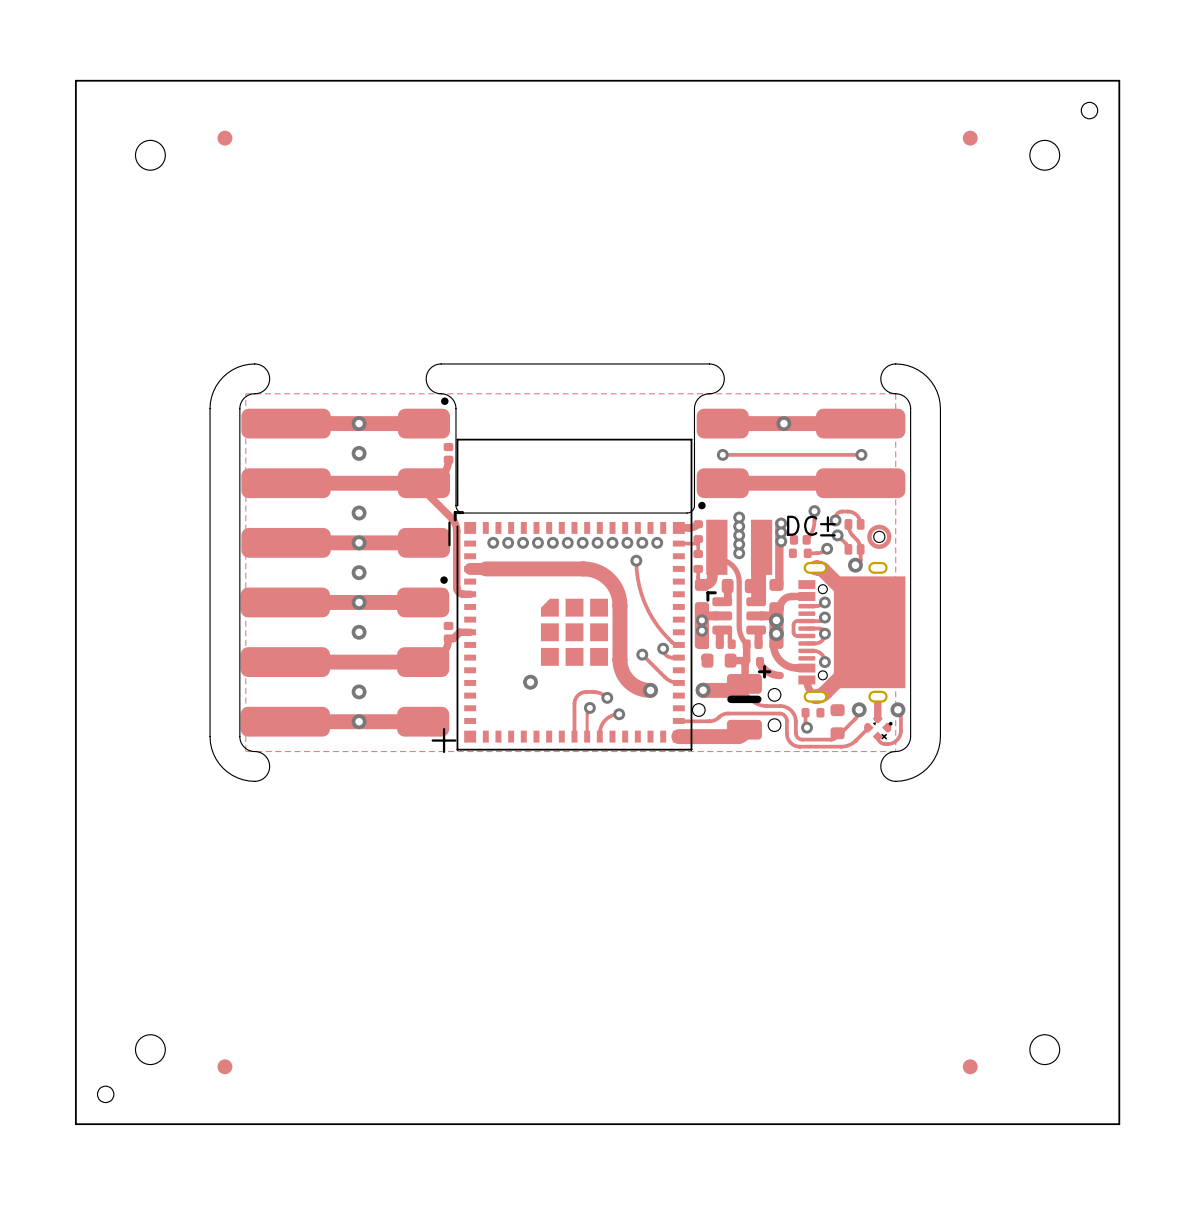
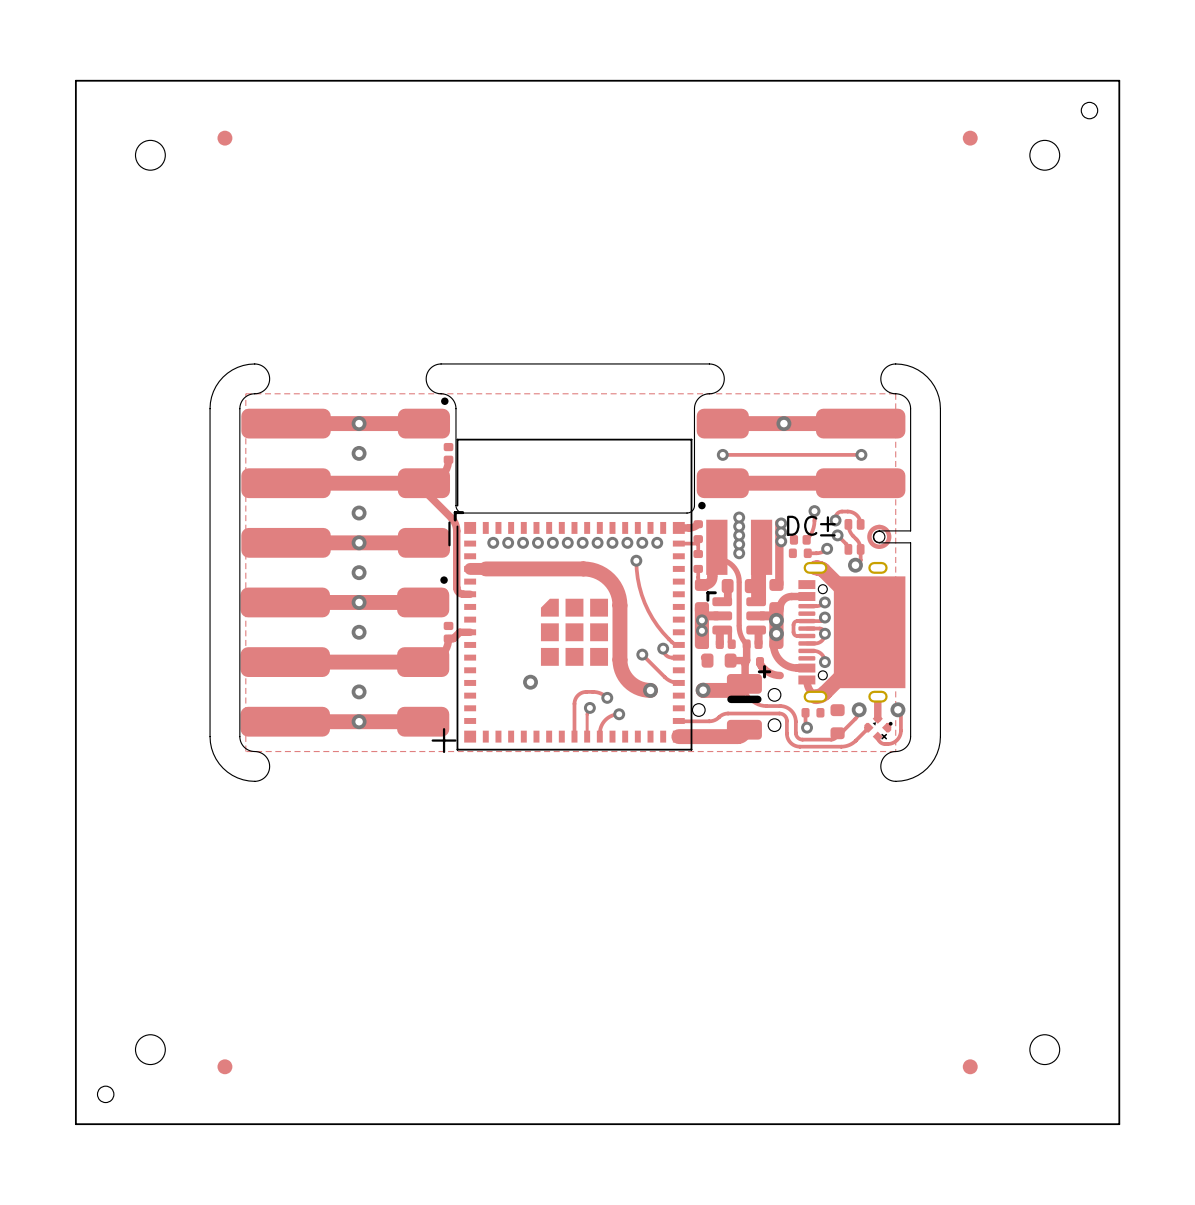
board edge: (910, 530) (910, 542) -> (910, 530) (878, 530) (873, 536) (878, 542) (910, 542)

